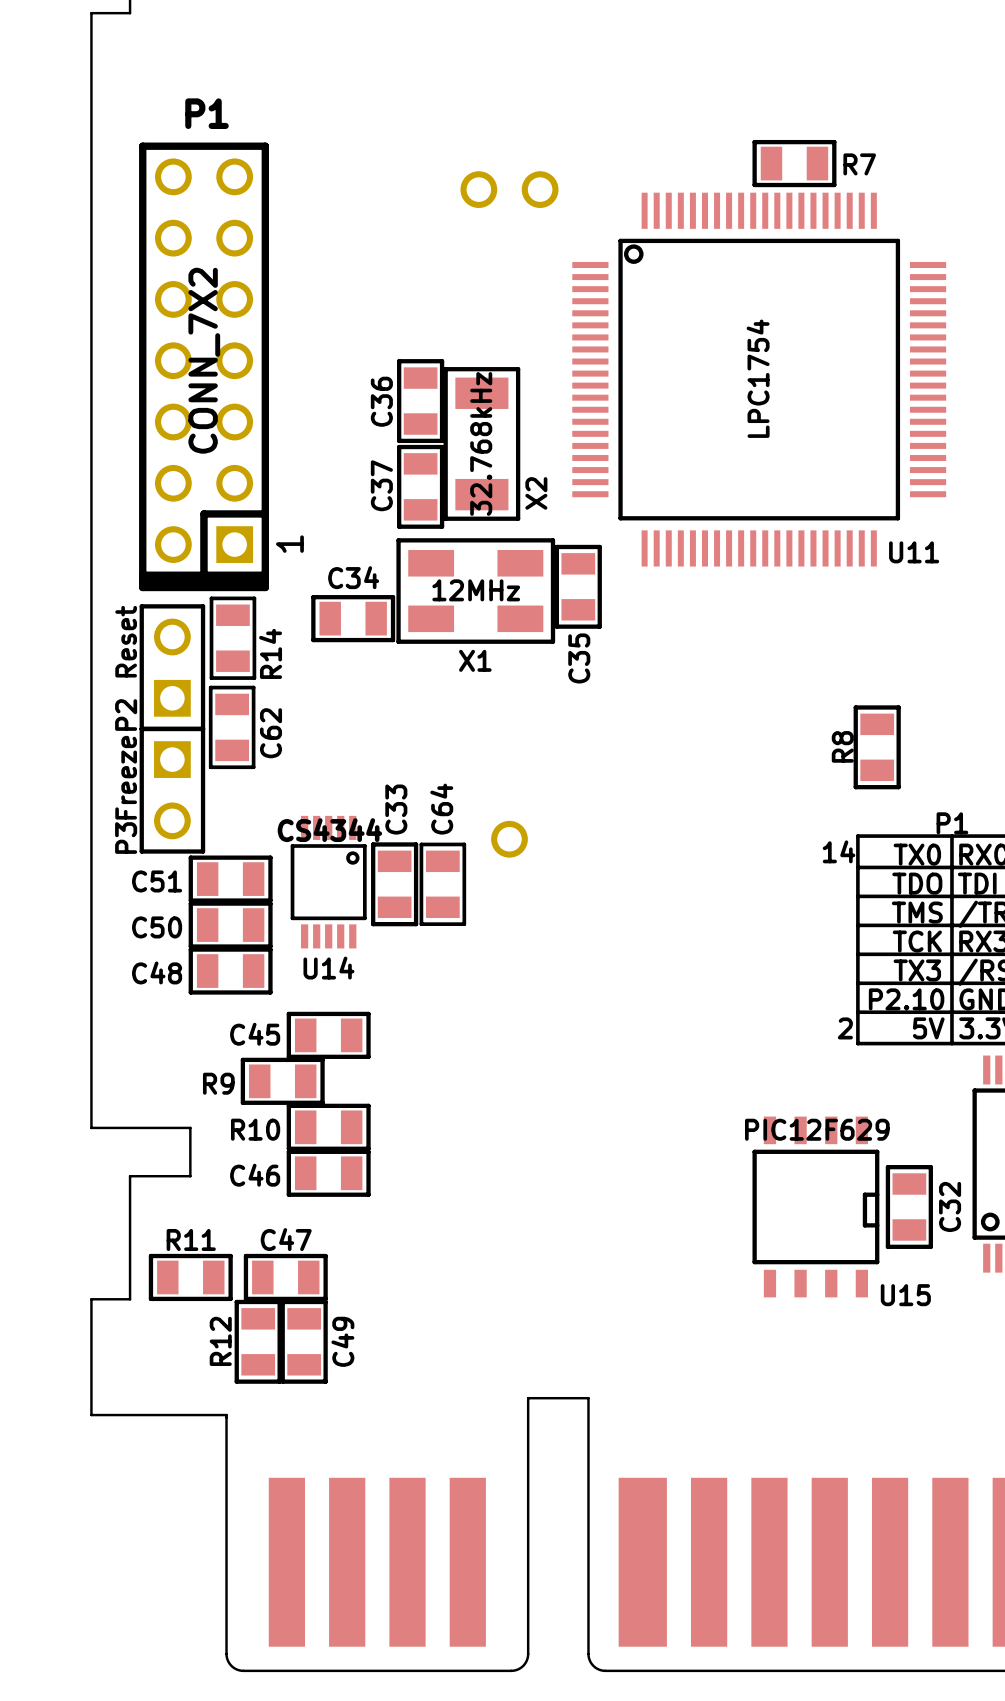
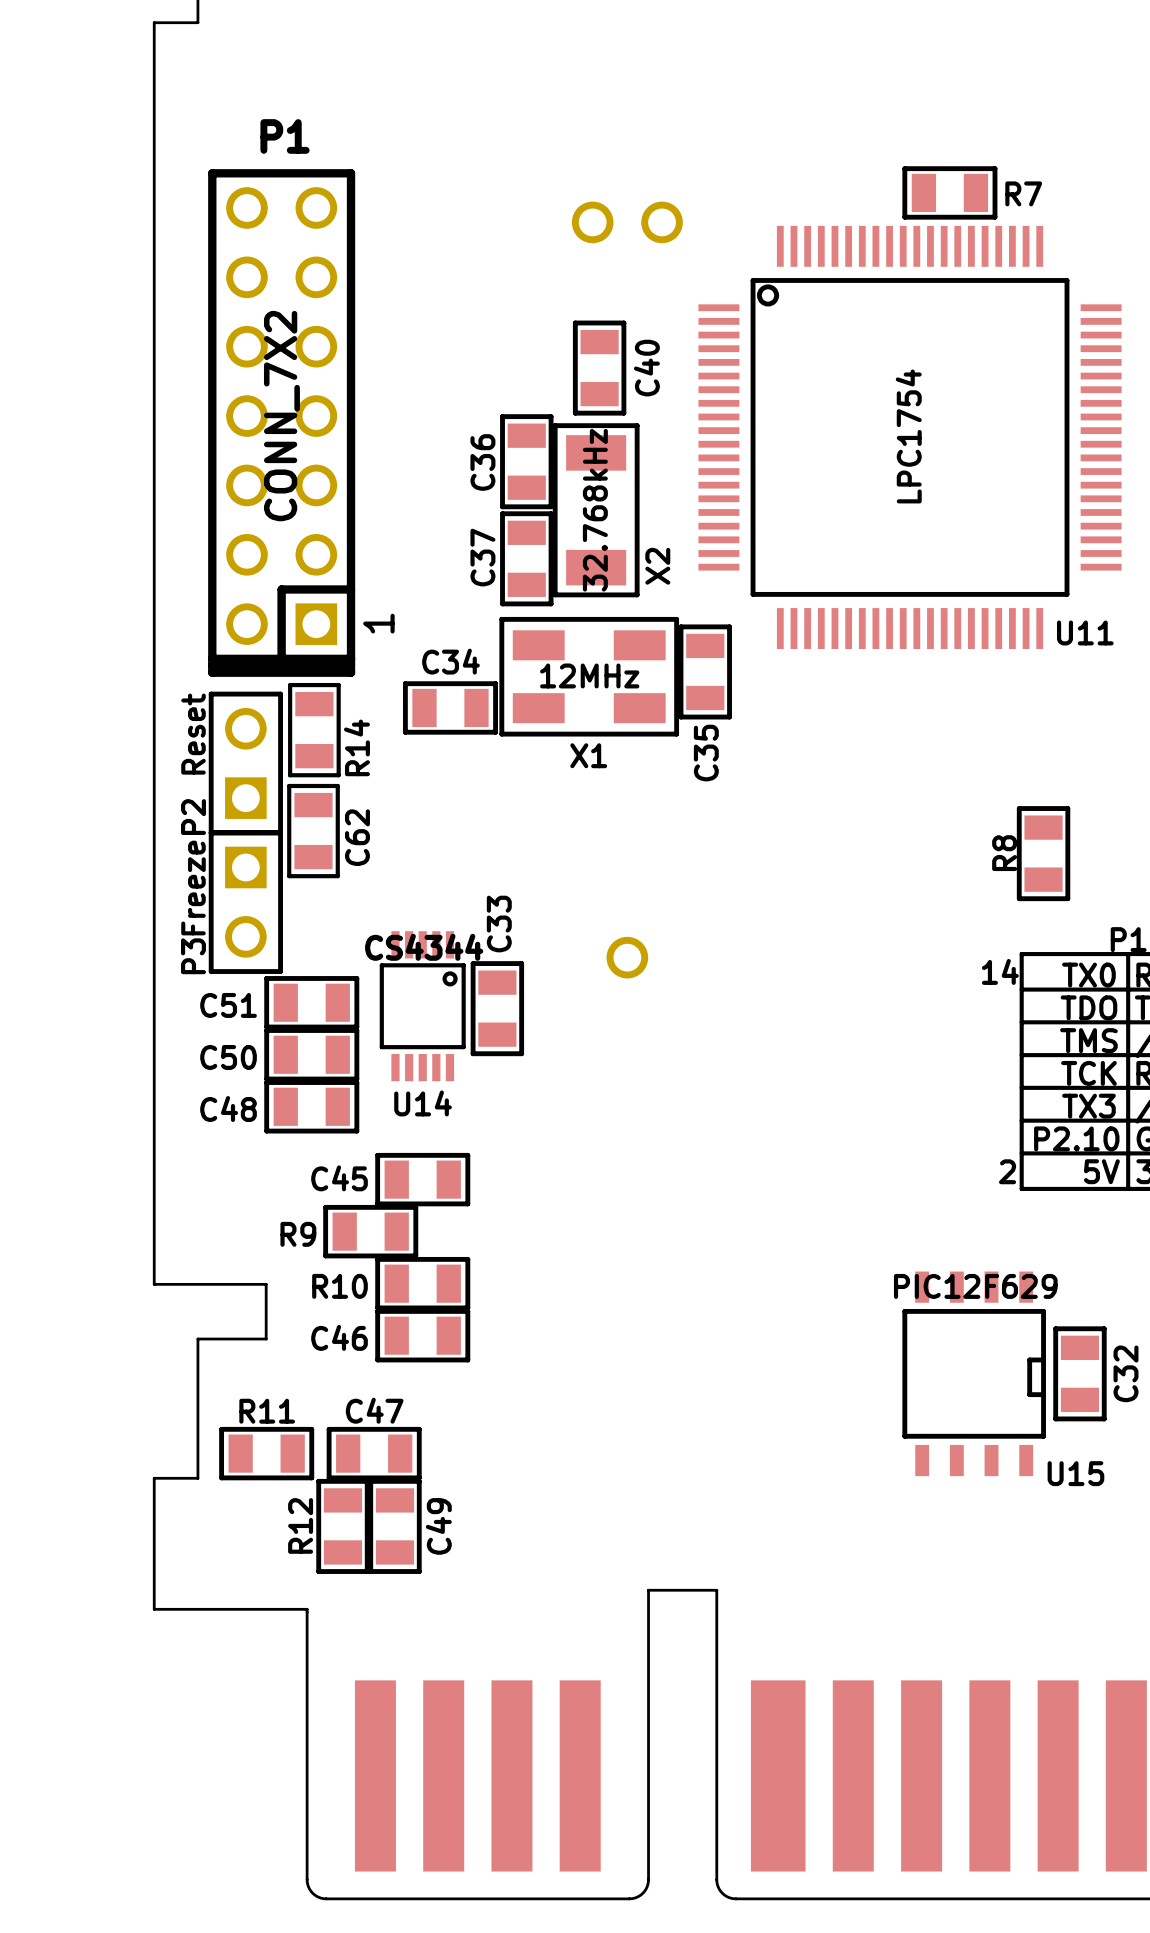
C40: none -> (599, 368)
C64: (442, 884) -> none

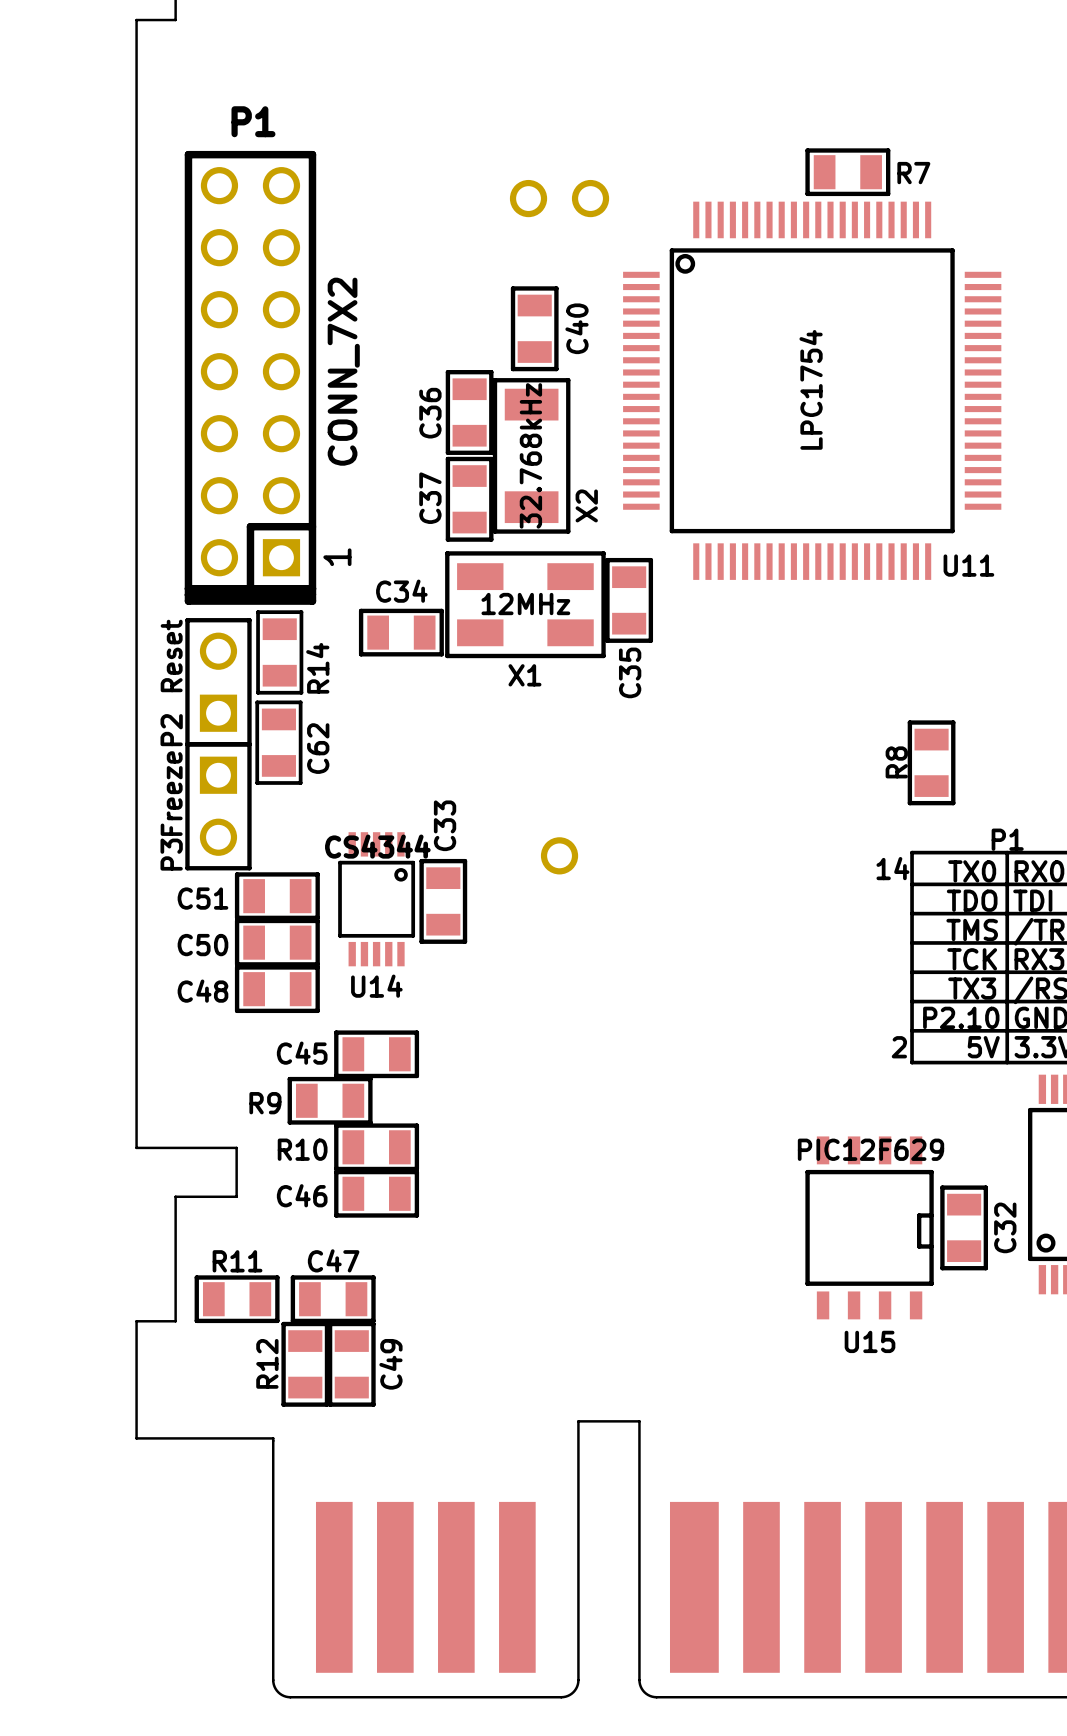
P1 value position: CONN_7X2 (281, 416) -> CONN_7X2 (343, 371)
U15 name position: U15 (1075, 1473) -> U15 (870, 1341)

